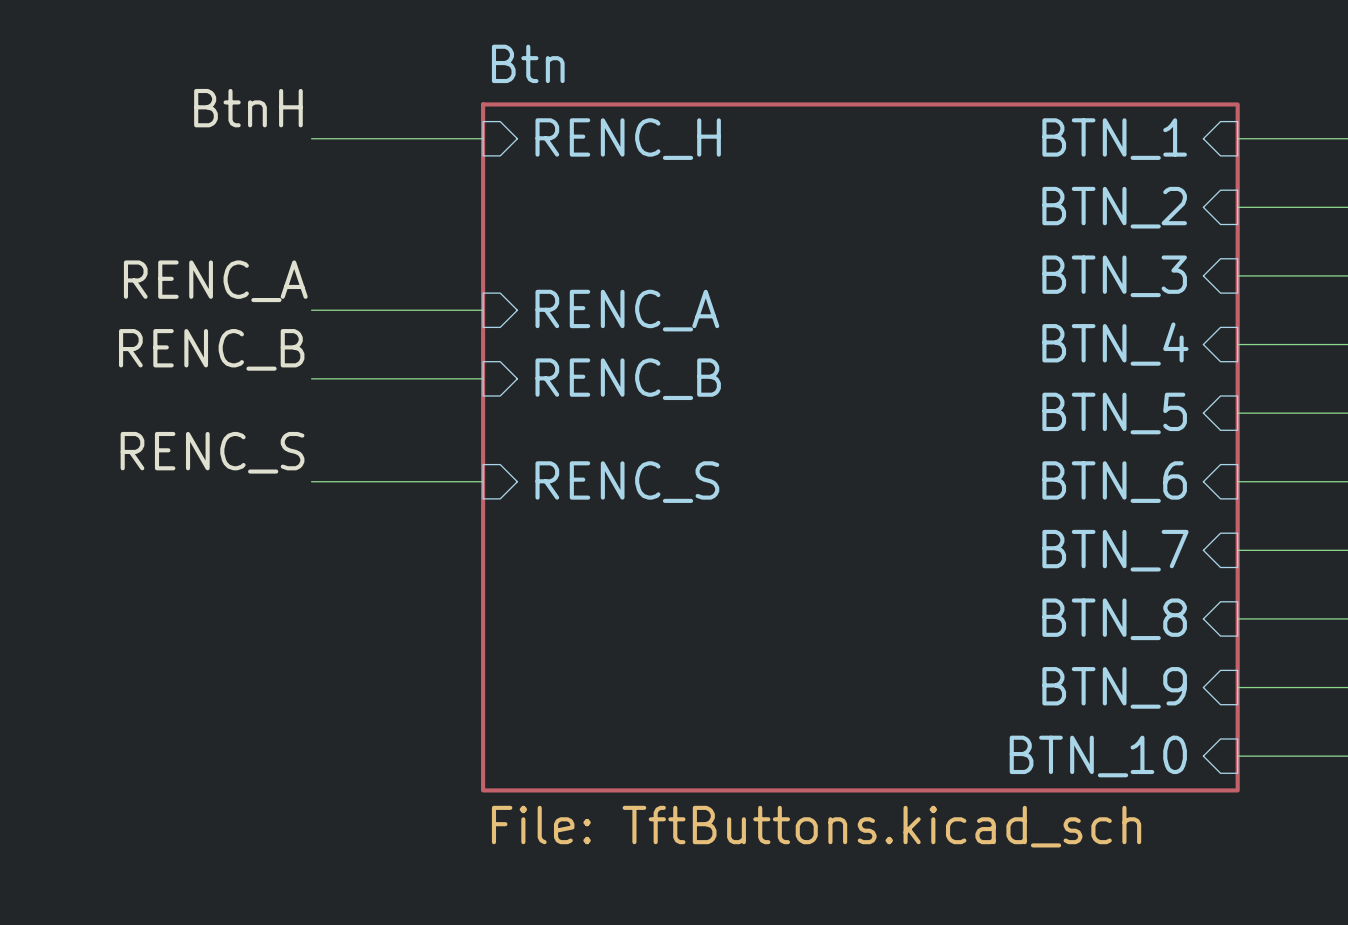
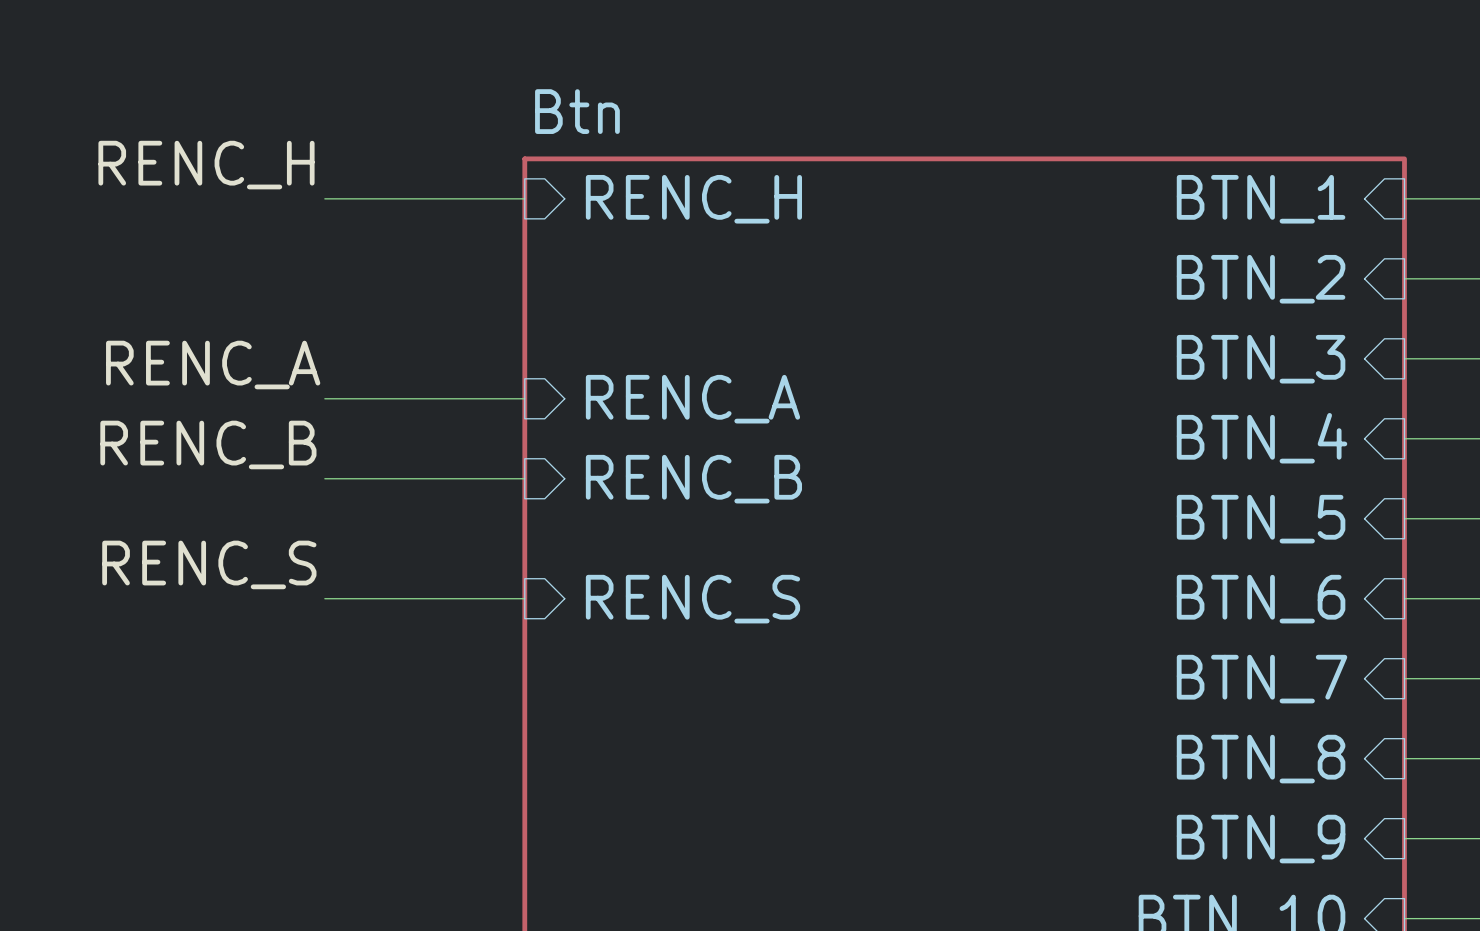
label: BtnH (248, 108) -> RENC_H (206, 165)

